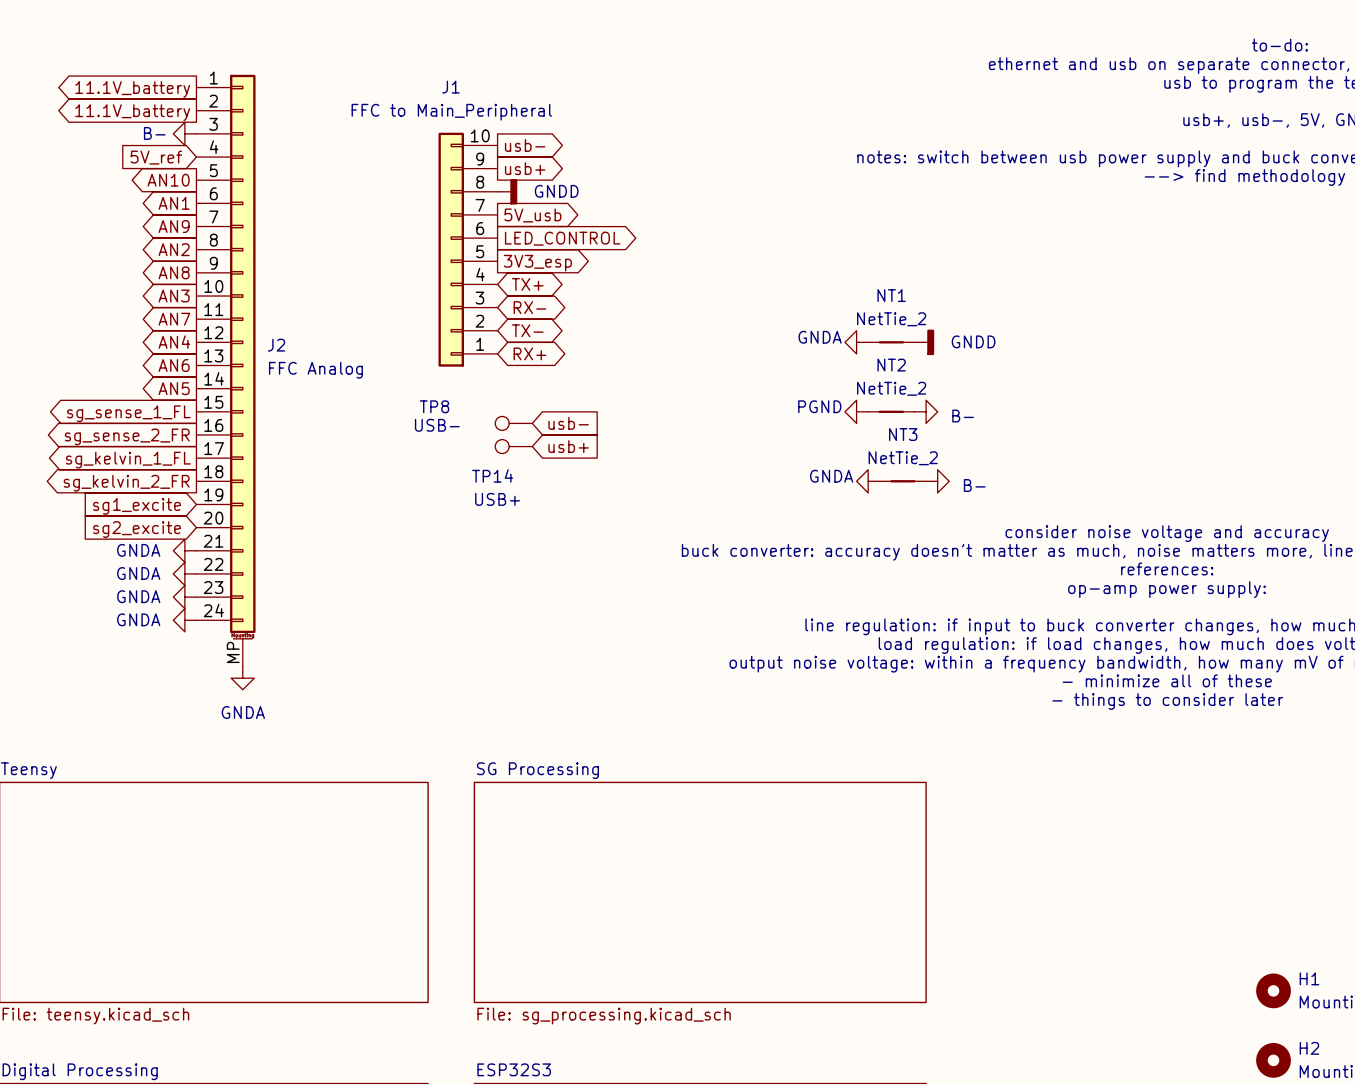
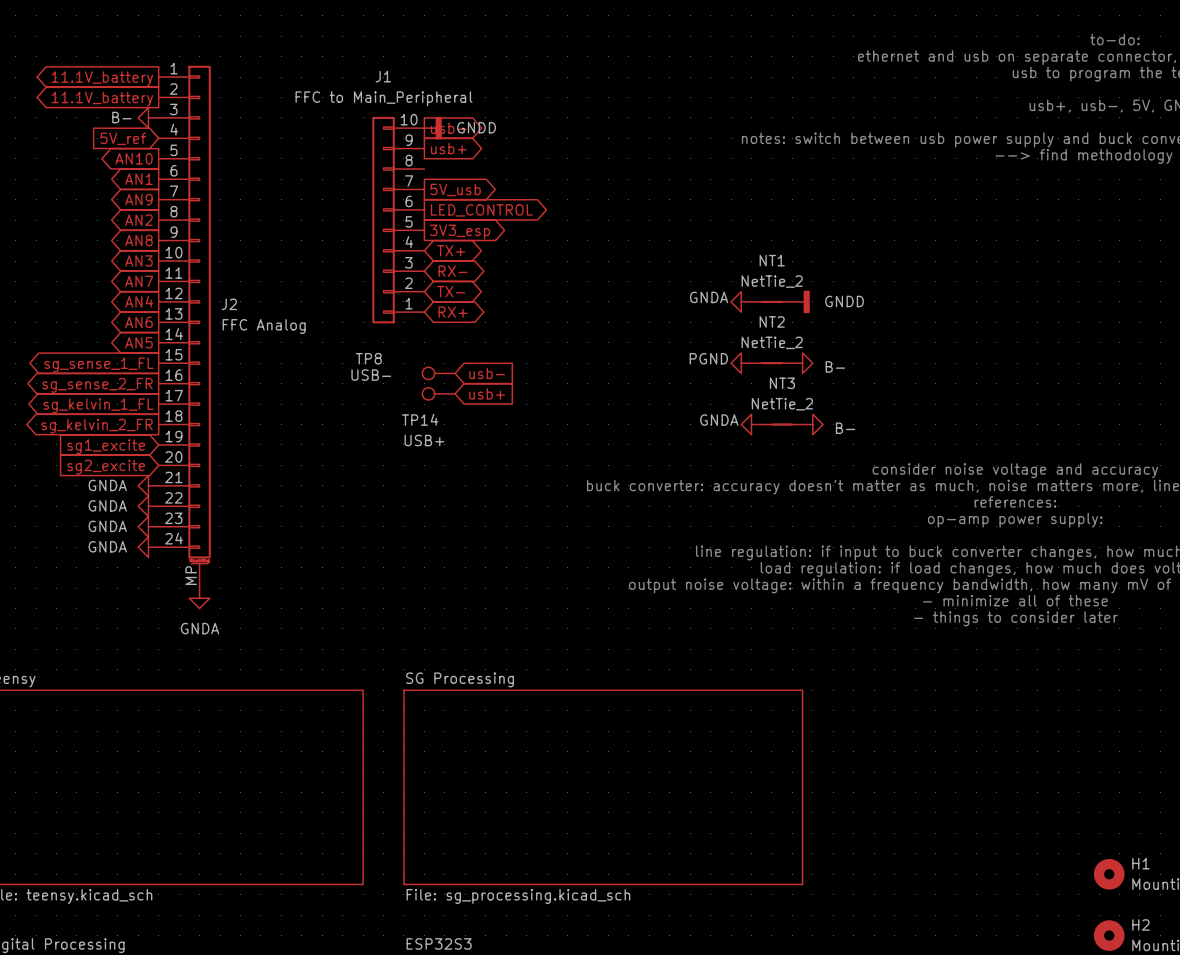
power symbol position: GNDD (507, 191) -> GNDD (433, 128)

